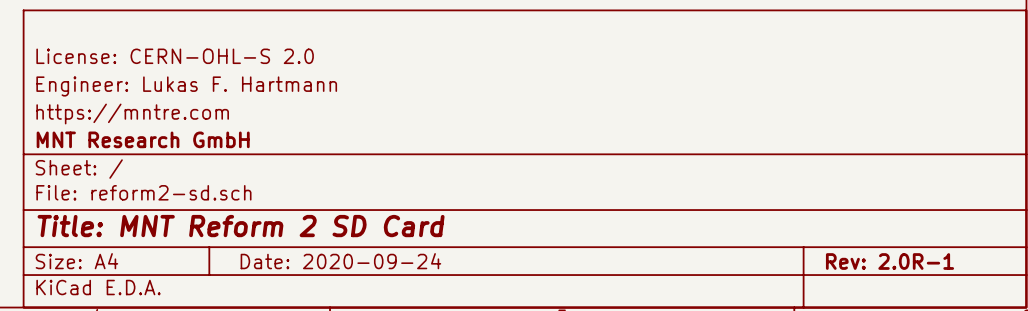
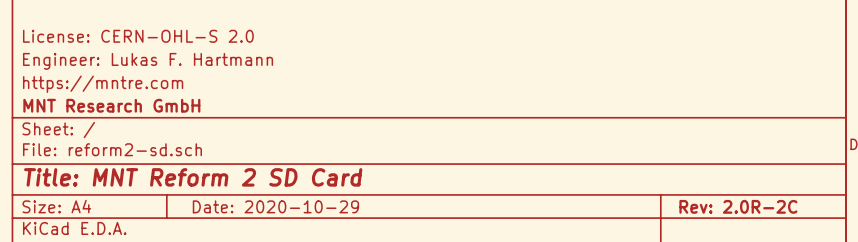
title block: Date: 2020-09-24 (340, 261) -> Date: 2020-10-29 (275, 206)
title block: Rev: 2.0R-1 (890, 261) -> Rev: 2.0R-2C (738, 206)

